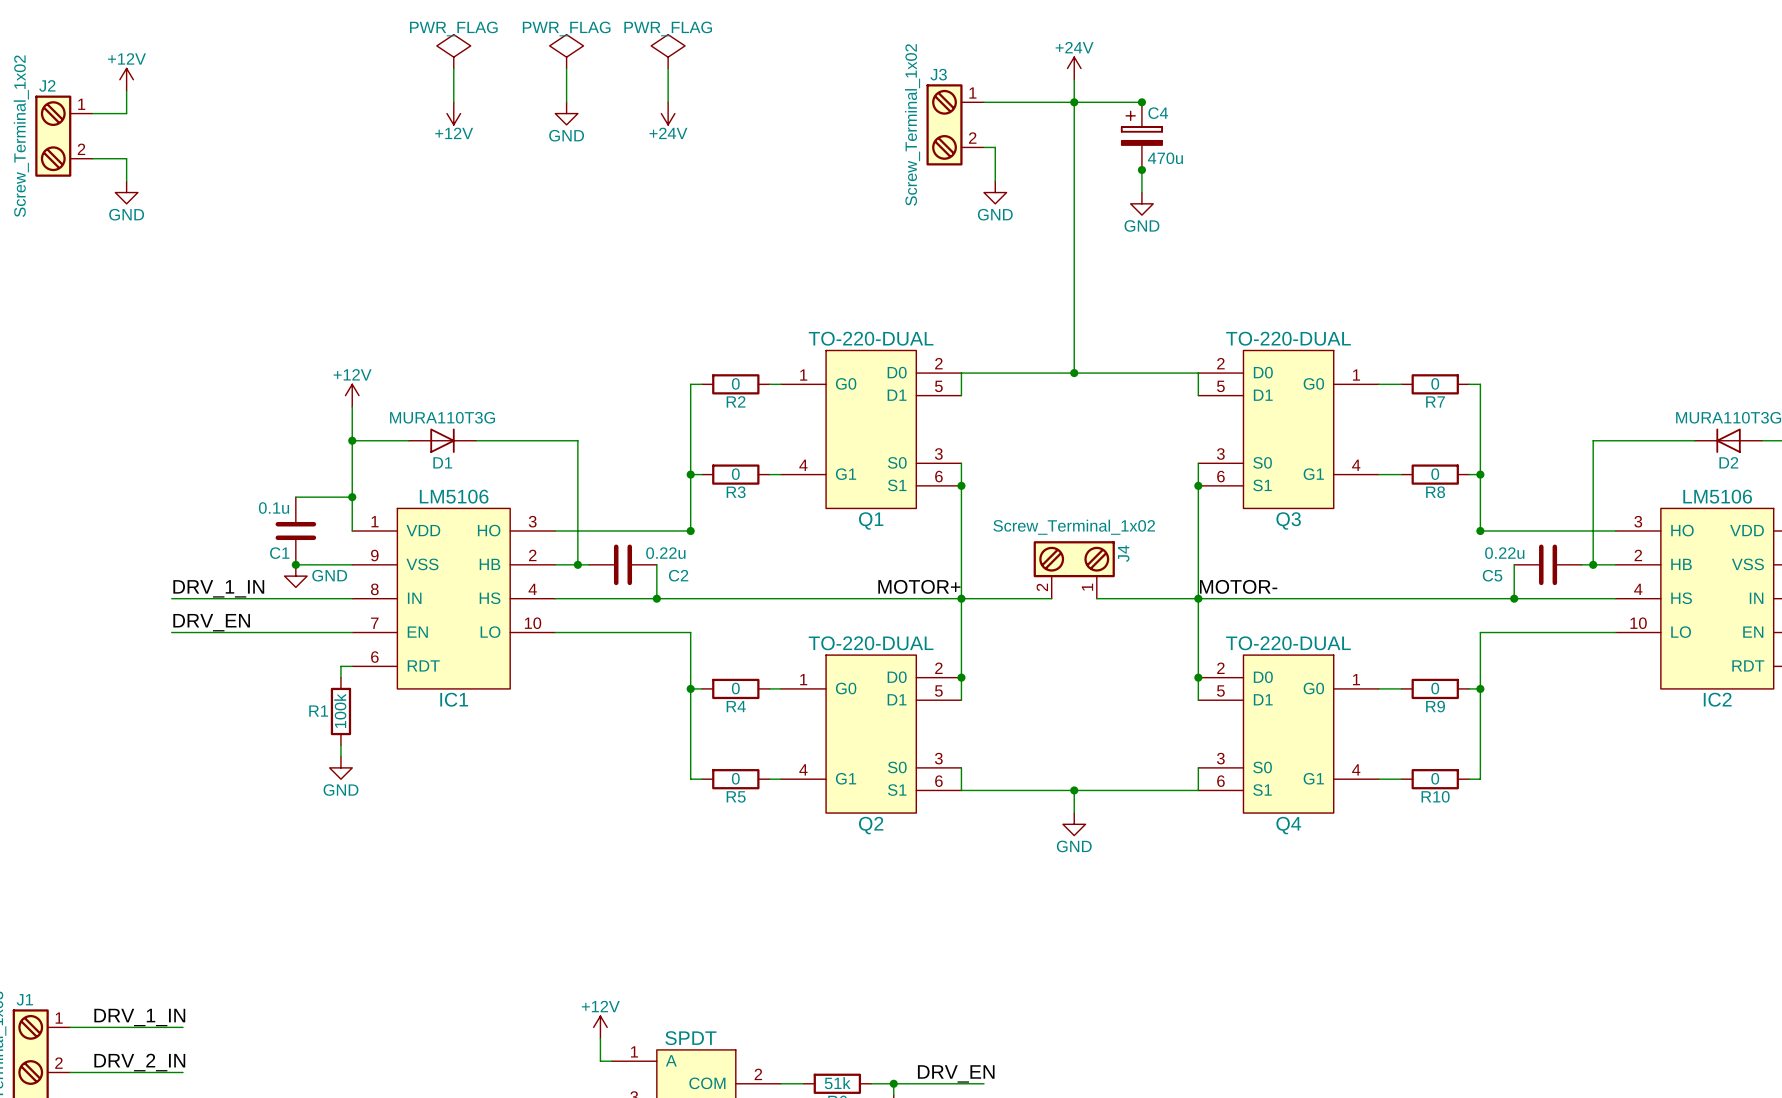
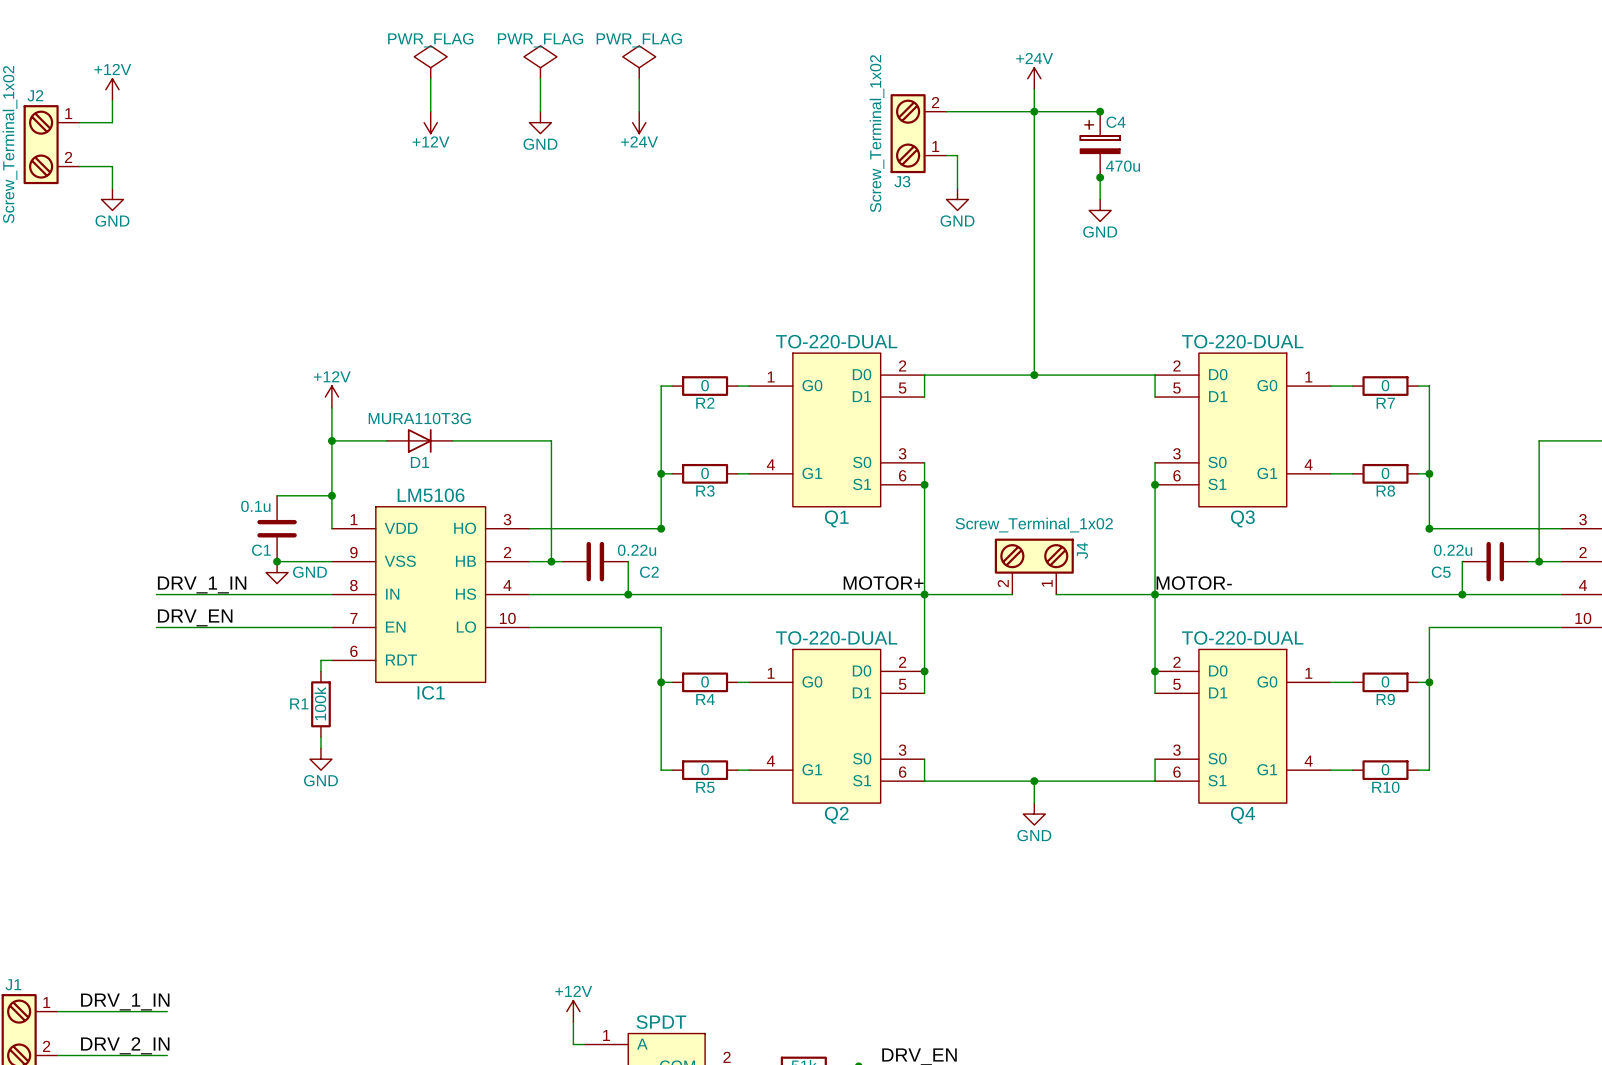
J3 flip: as is (944, 124) -> up-down (908, 133)

